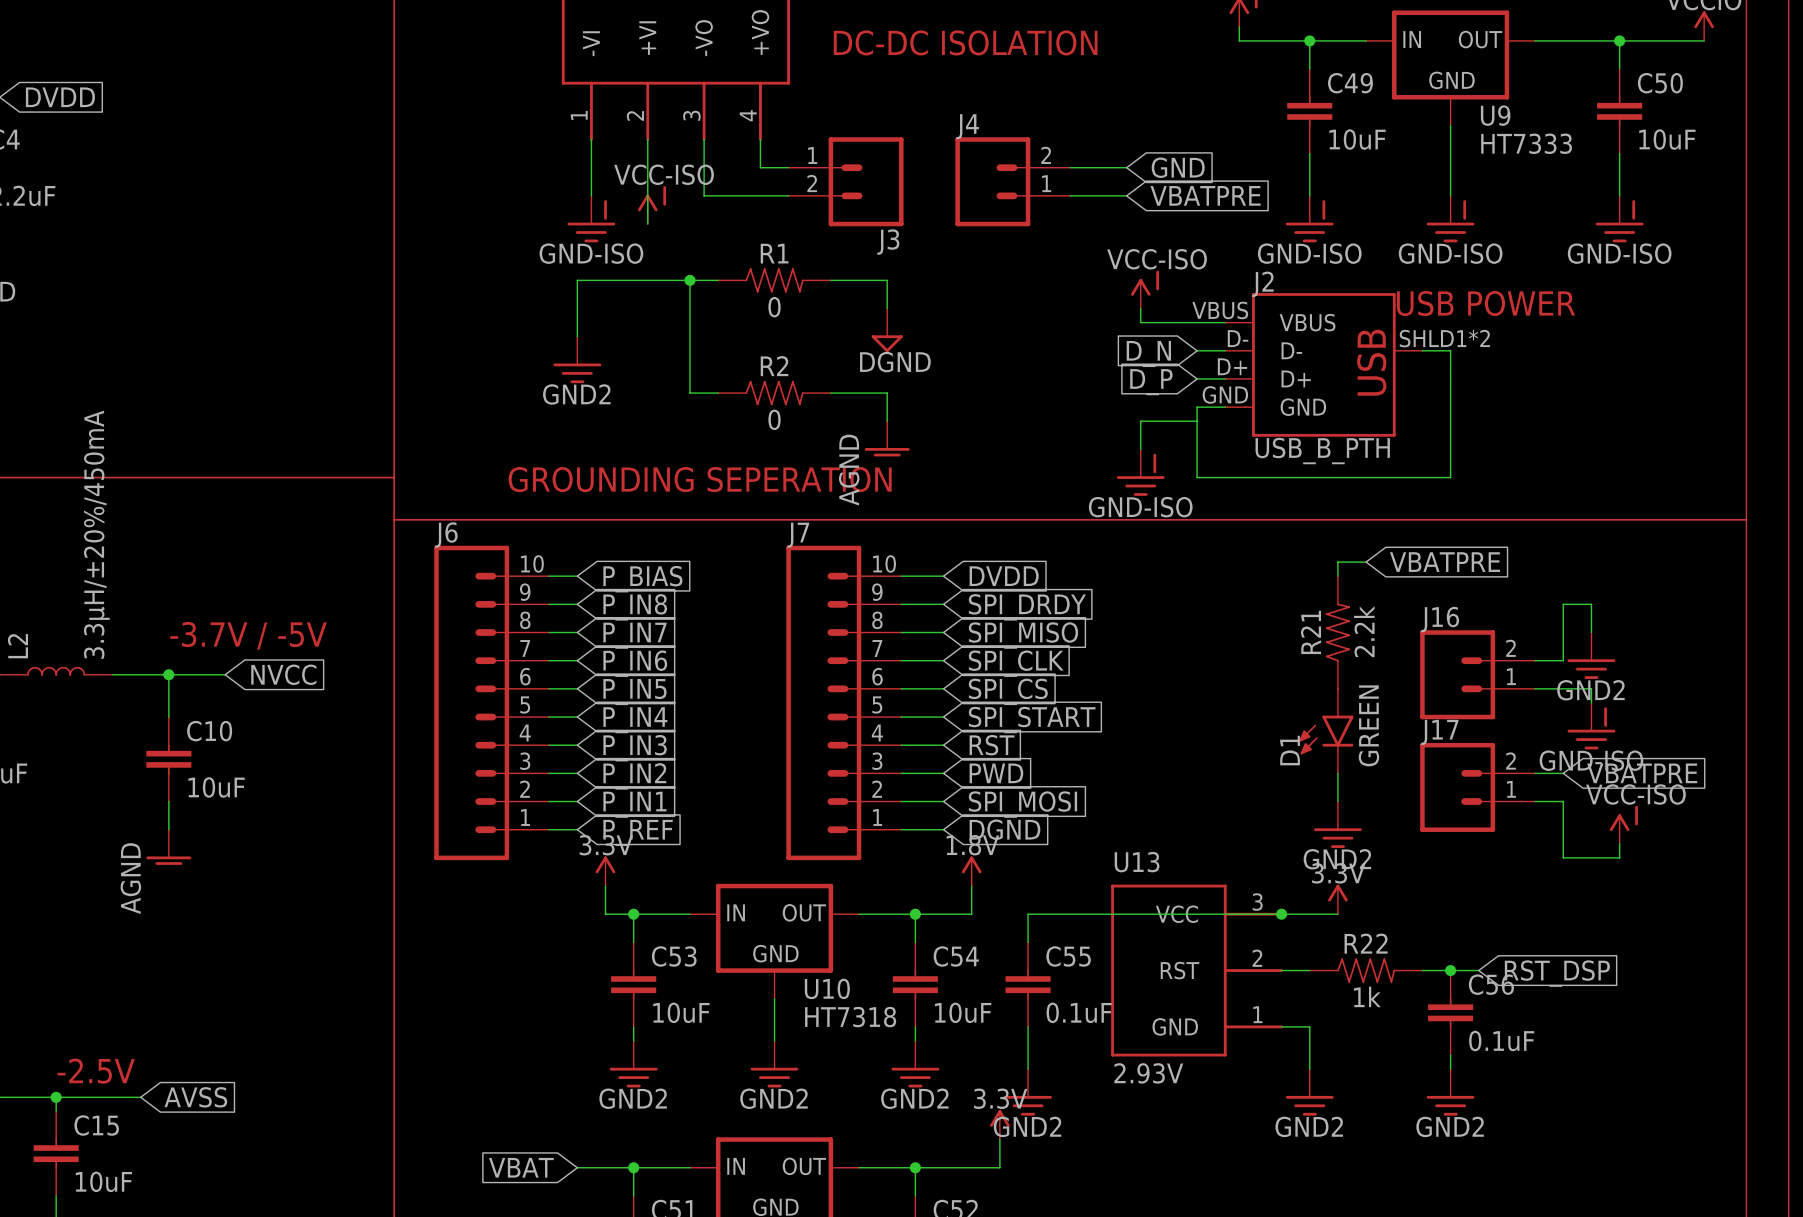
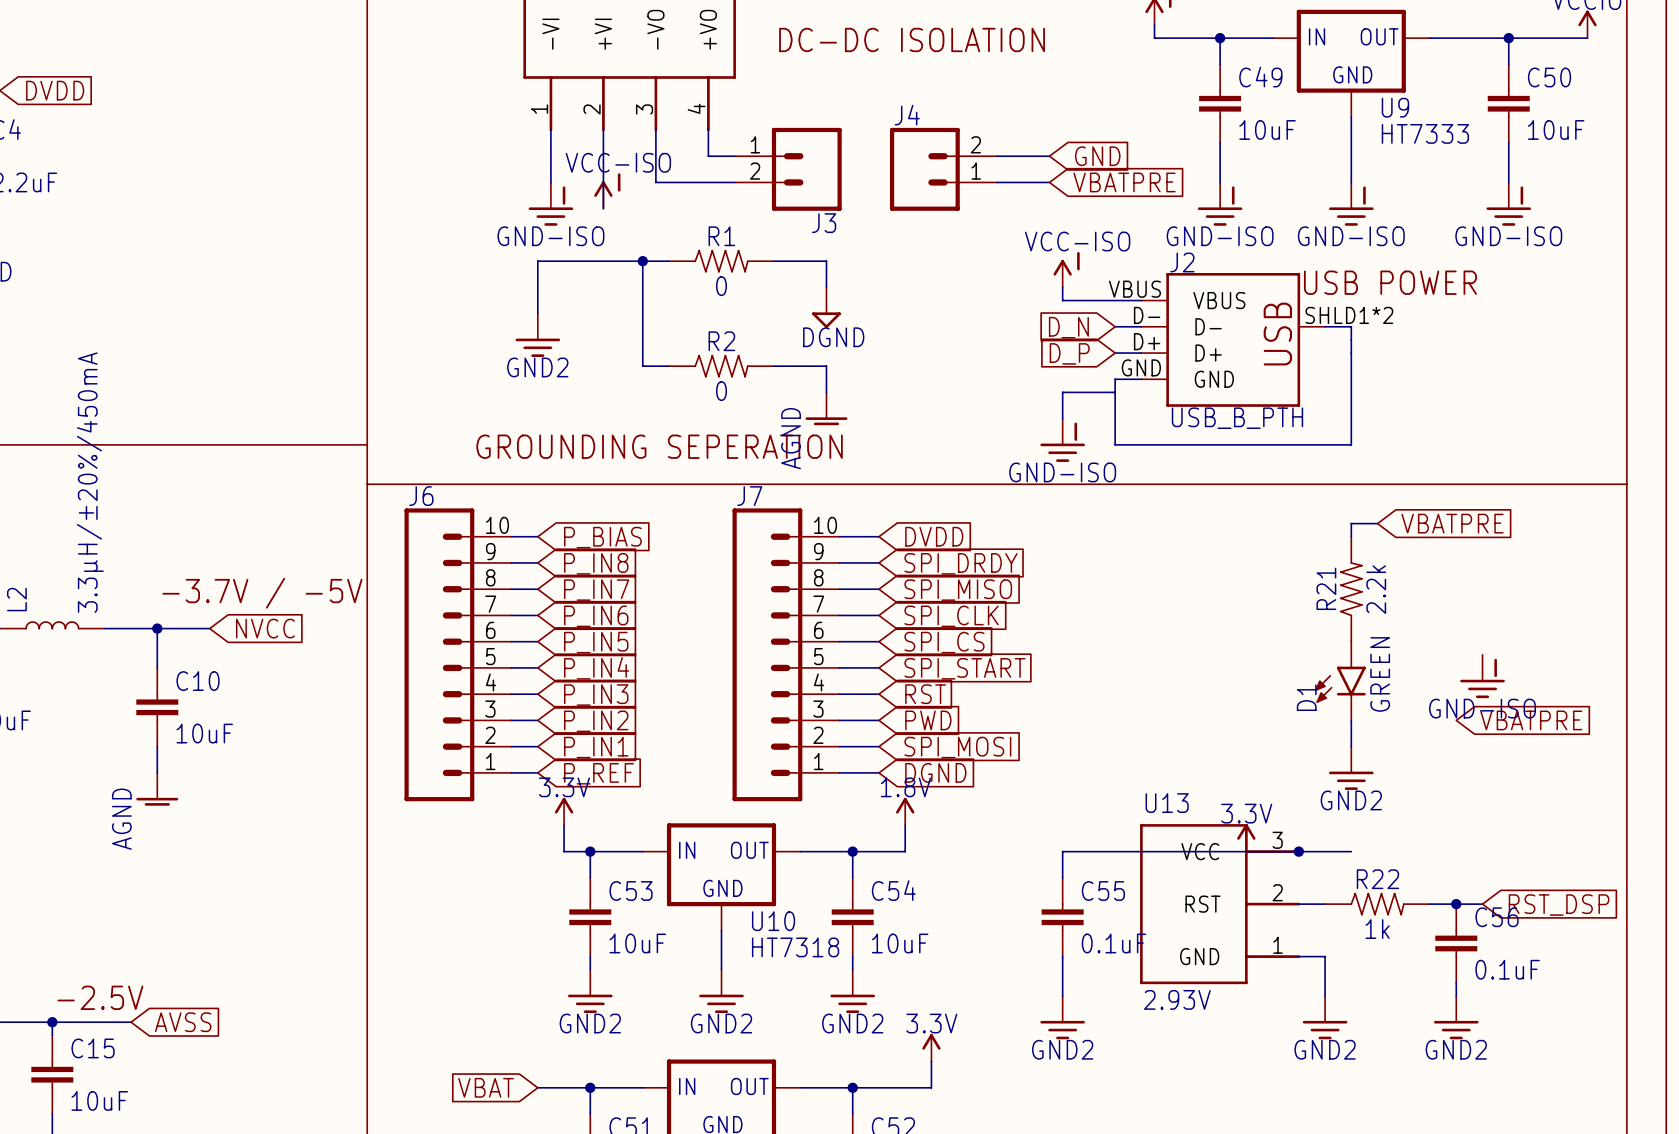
wire: (1366, 562) (1337, 562) (1337, 576) -> (1377, 523) (1351, 523) (1351, 536)
global label position: VBATPRE (1445, 562) -> VBATPRE (1452, 523)
R21 position: (1337, 632) -> (1351, 589)
wire: (1591, 632) (1591, 604) (1563, 604) (1563, 660) (1535, 660) -> none
power symbol: GND2 (1591, 655) -> none
J16: (1477, 674) -> none
wire: (1535, 688) (1591, 688) (1591, 702) -> none
D1 position: (1326, 731) -> (1340, 681)
wire: (1337, 773) (1337, 801) -> (1351, 720) (1351, 746)
wire: (1535, 773) (1563, 773) -> none
J17: (1477, 787) -> none
wire: (1535, 801) (1563, 801) (1563, 857) (1619, 857) (1619, 843) -> none
power symbol: GND2 (1337, 824) -> none
power symbol: none -> GND2 (1351, 768)
power symbol: VCC-ISO (1623, 824) -> none
wire: (1140, 914) (1028, 914) (1028, 942) -> (1062, 851) (1062, 877)
junction: (1281, 914) -> none
wire: none -> (1246, 851) (1351, 851)
junction: none -> (1298, 851)
U13 position: (1197, 970) -> (1220, 904)
wire: (1281, 970) (1309, 970) -> none
R22 position: (1366, 970) -> (1377, 904)
junction: (1450, 970) -> none
wire: none -> (1430, 904) (1482, 904)
junction: none -> (1456, 904)
global label position: RST_DSP (1557, 973) -> RST_DSP (1559, 904)
C55 position: (1028, 984) -> (1062, 917)
C56 position: (1450, 1012) -> (1456, 943)
wire: (1028, 1026) (1028, 1069) -> (1062, 956) (1062, 995)
wire: (1281, 1026) (1309, 1026) (1309, 1069) -> (1298, 956) (1325, 956) (1325, 995)
wire: (1450, 1055) (1450, 1069) -> (1456, 982) (1456, 995)
power symbol: GND2 (1028, 1092) -> none
power symbol: none -> GND2 (1062, 1017)
power symbol: GND2 (1309, 1092) -> none
power symbol position: GND2 (1450, 1092) -> GND2 (1325, 1017)
power symbol: none -> GND2 (1456, 1017)

